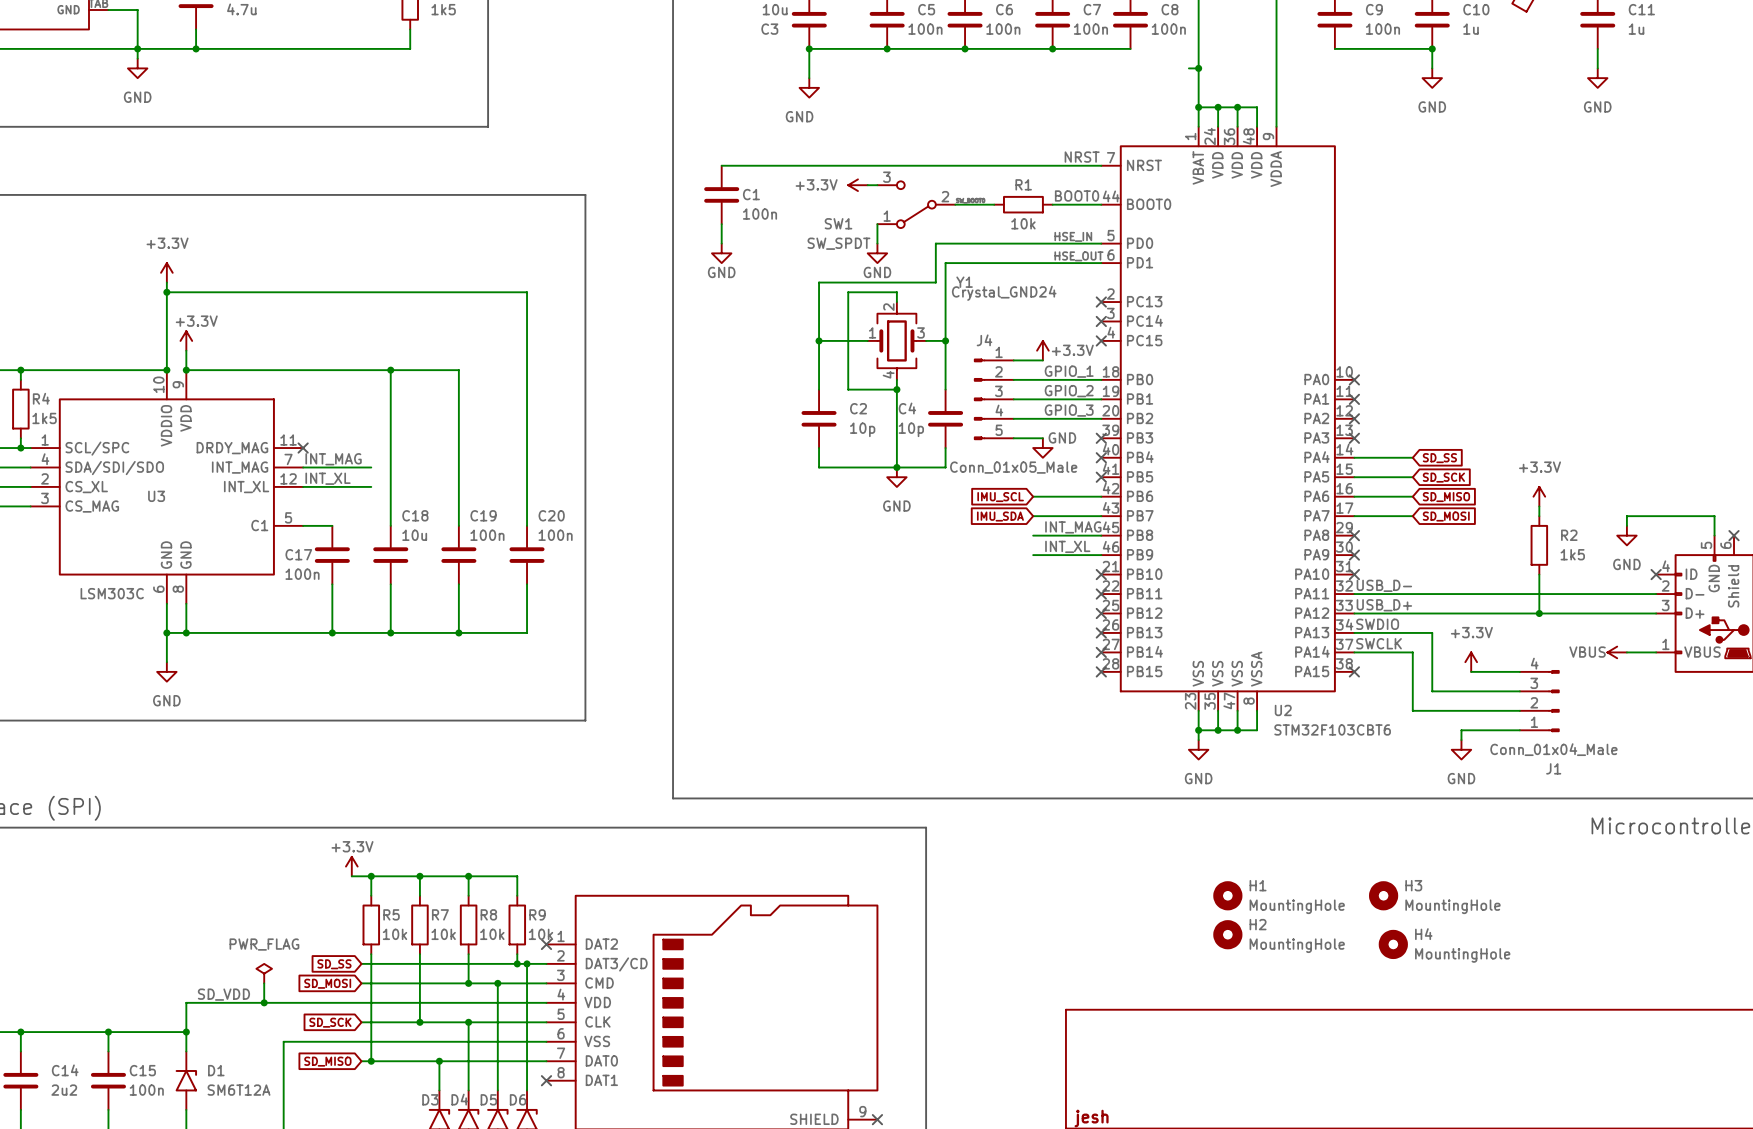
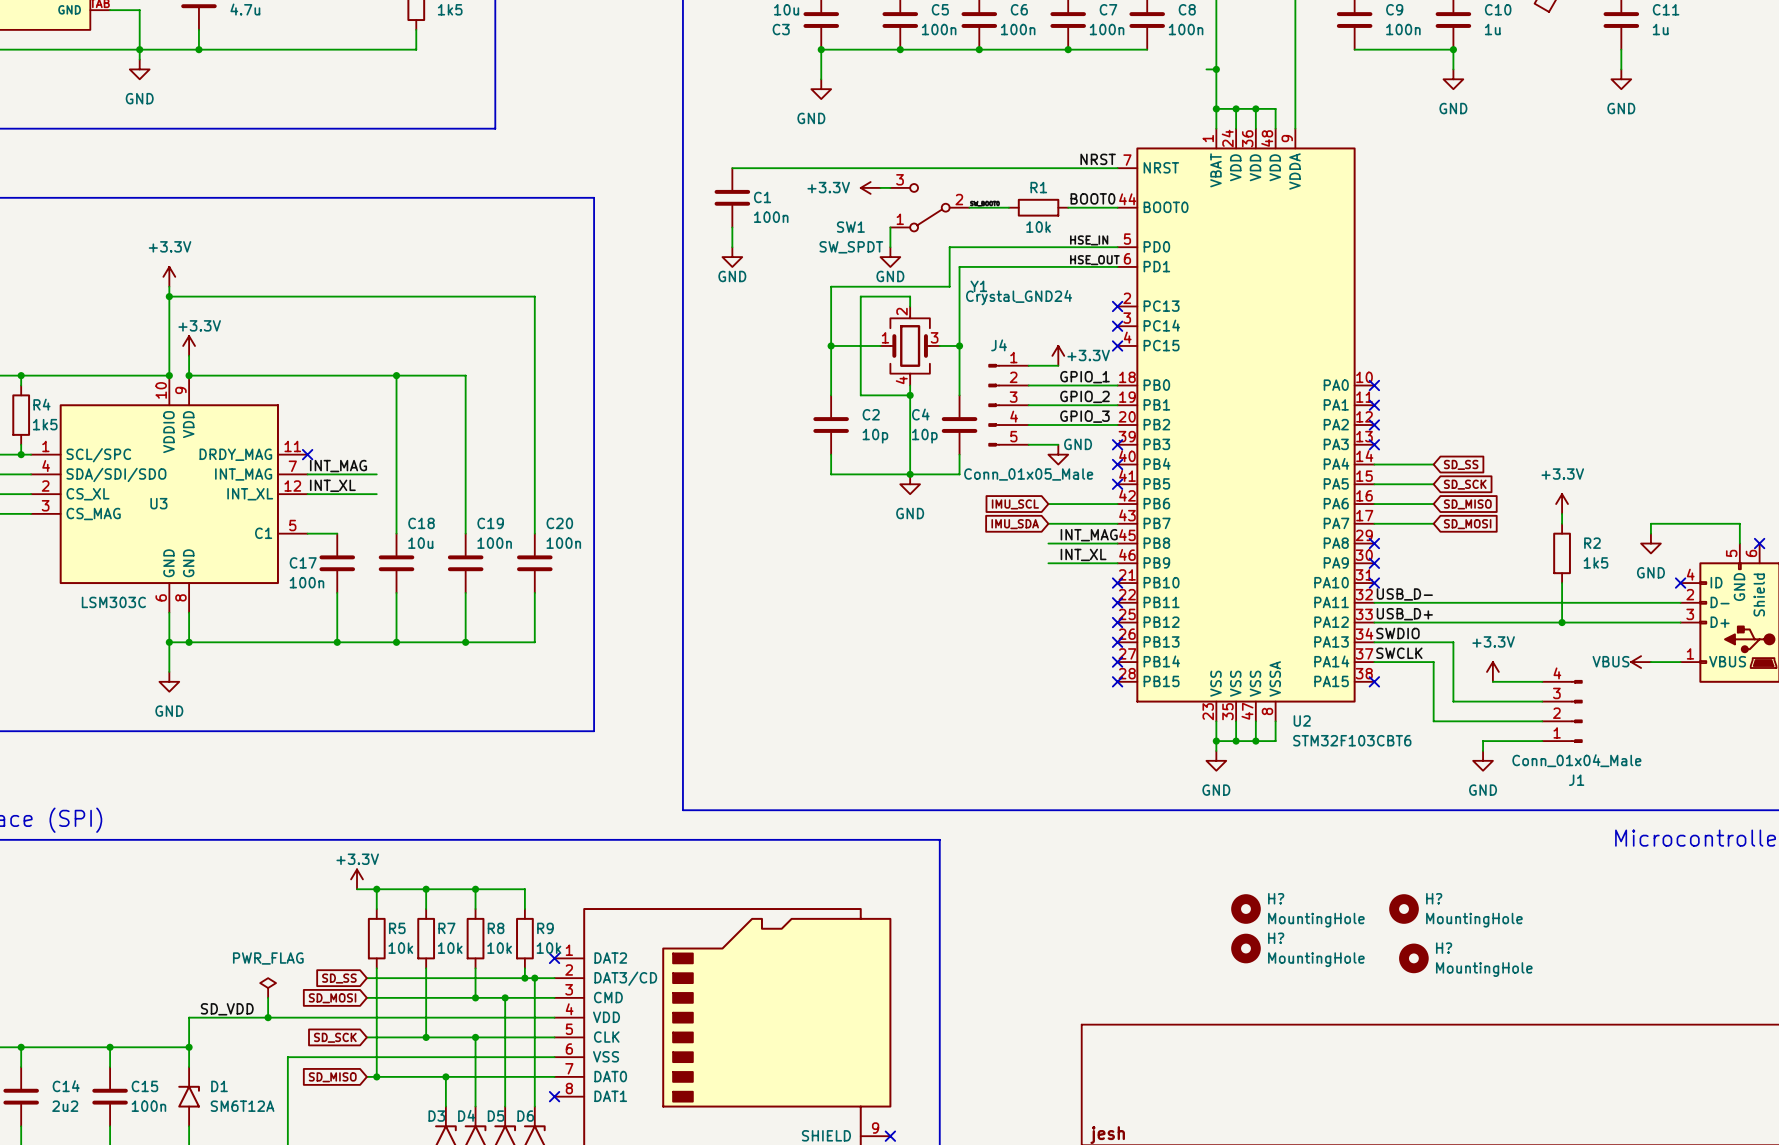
H1 name: H1 (1258, 885) -> H? (1276, 898)
H3 name: H3 (1413, 885) -> H? (1434, 898)
H2 name: H2 (1258, 924) -> H? (1276, 938)
H4 name: H4 (1423, 934) -> H? (1444, 948)

